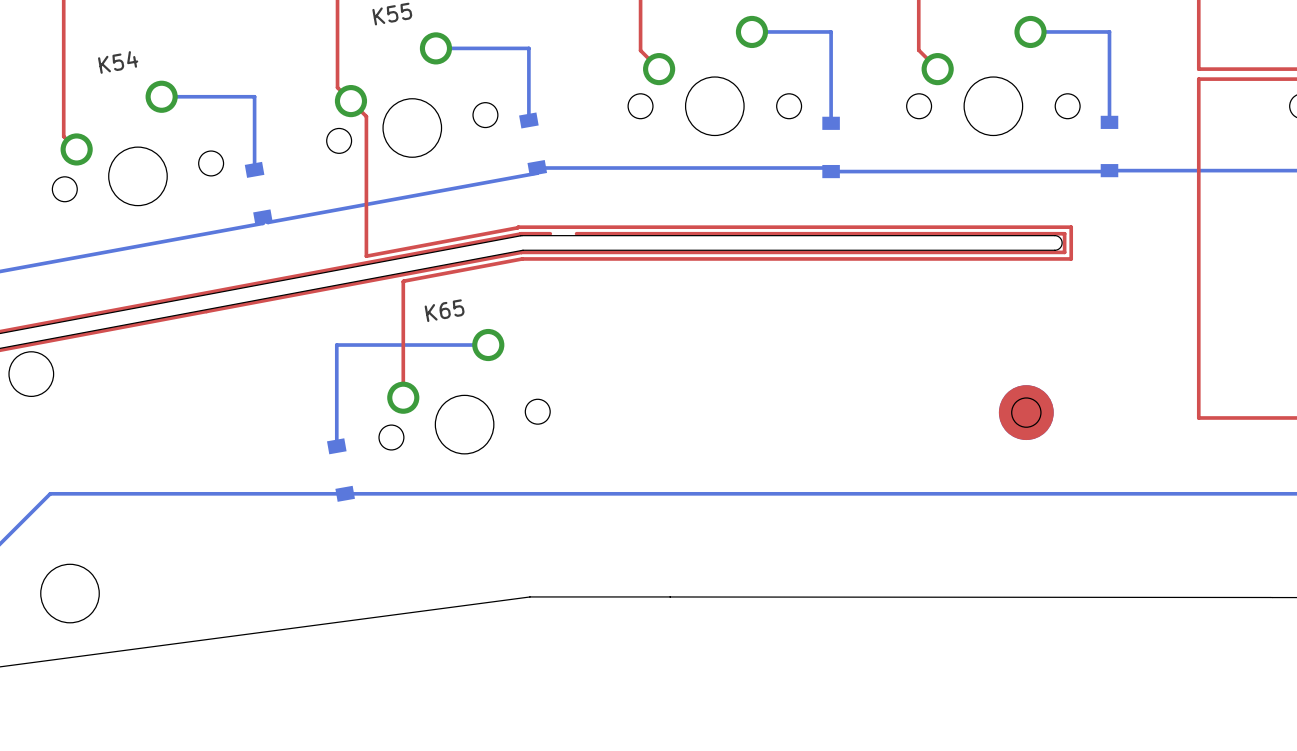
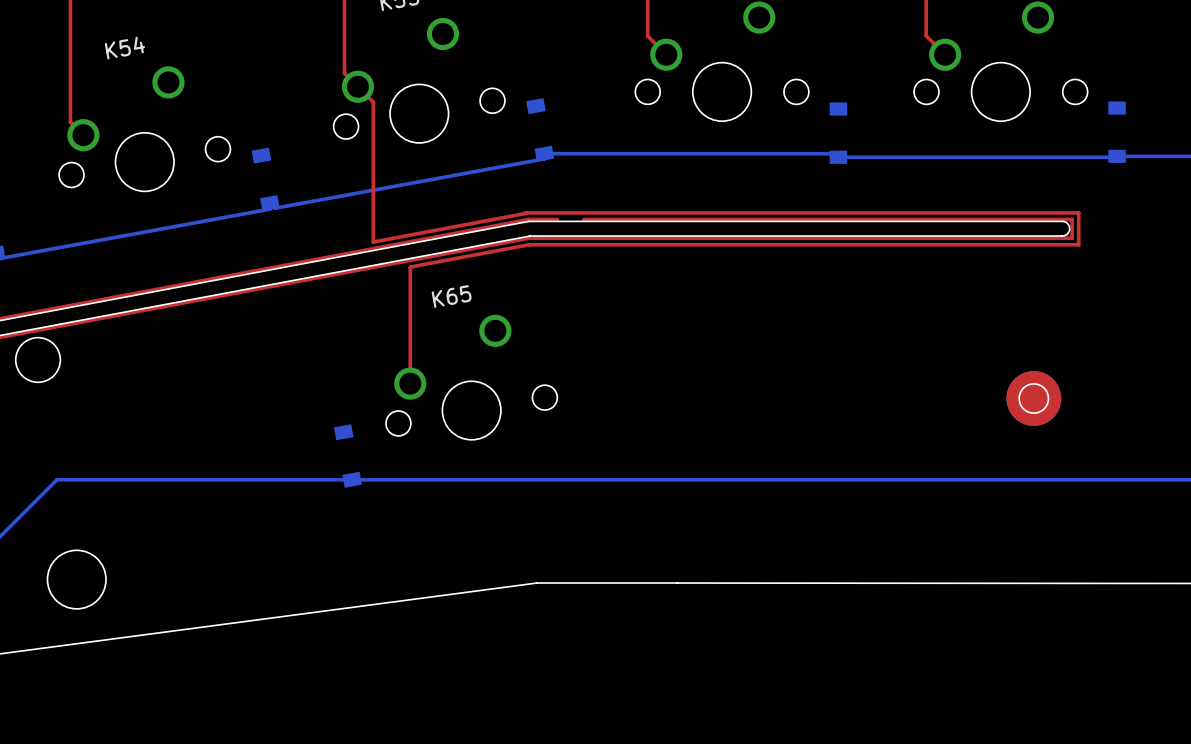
bottom track: (751, 31) (831, 31) (831, 123) -> none
bottom track: (1030, 31) (1109, 31) (1109, 122) -> none
bottom track: (435, 48) (528, 48) (528, 120) -> none
bottom track: (161, 96) (254, 96) (254, 169) -> none
bottom track: (488, 345) (336, 345) (336, 446) -> none

